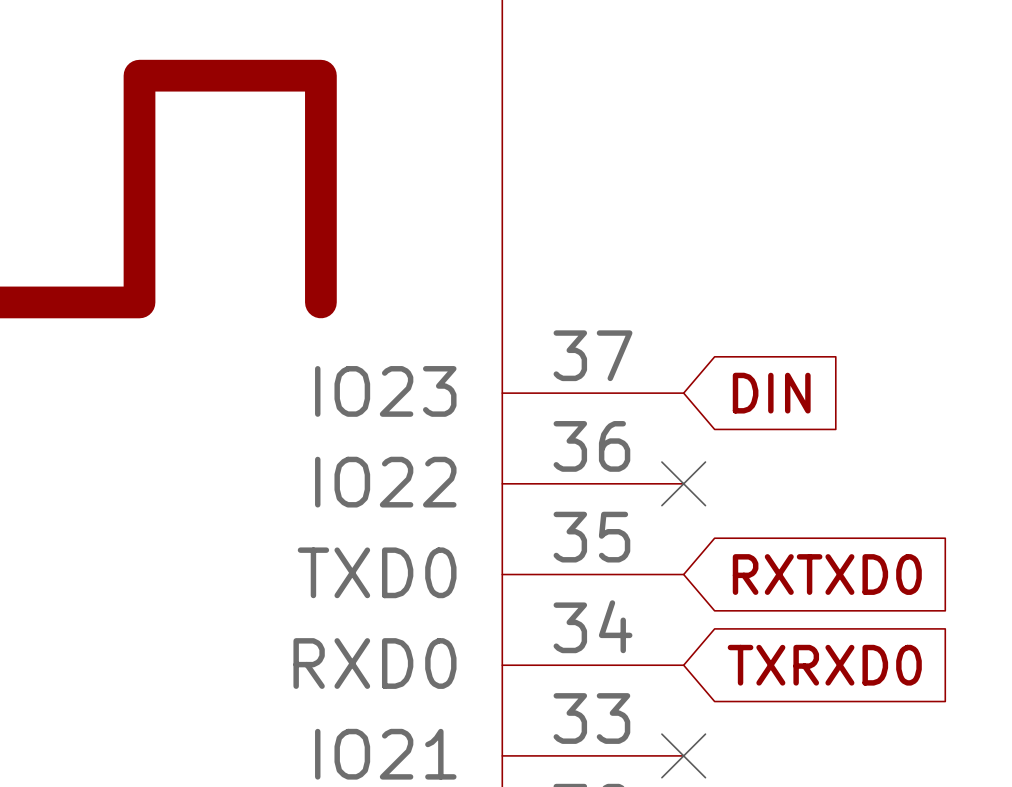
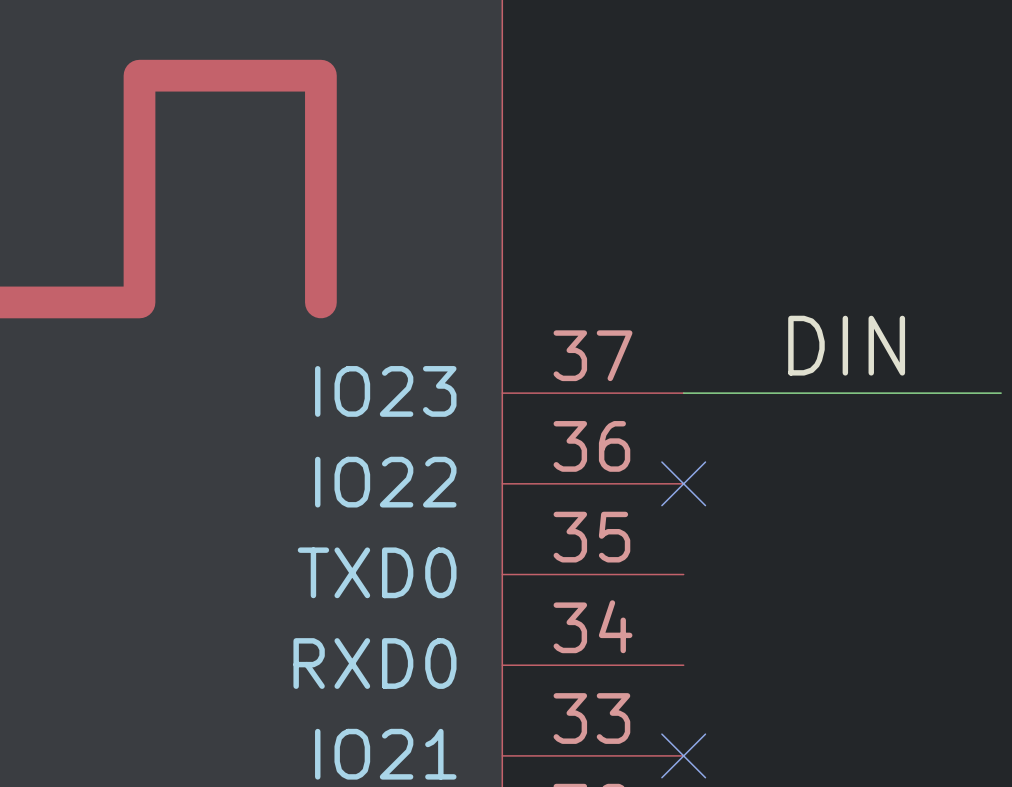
label: none -> DIN (846, 345)
wire: none -> (683, 393) (1001, 393)
global label: DIN (771, 393) -> none
global label: RXTXD0 (827, 574) -> none
global label: TXRXD0 (824, 665) -> none

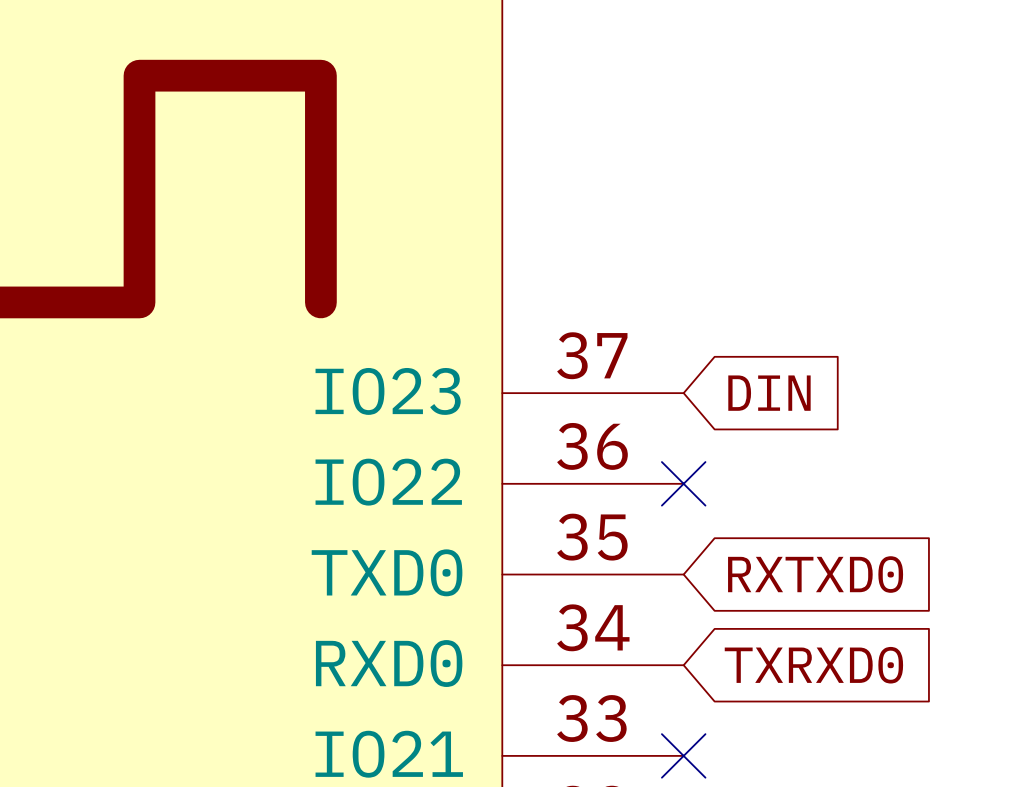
label: DIN (846, 345) -> none
wire: (683, 393) (1001, 393) -> none
global label: none -> DIN (769, 393)
global label: none -> RXTXD0 (815, 574)
global label: none -> TXRXD0 (813, 665)

